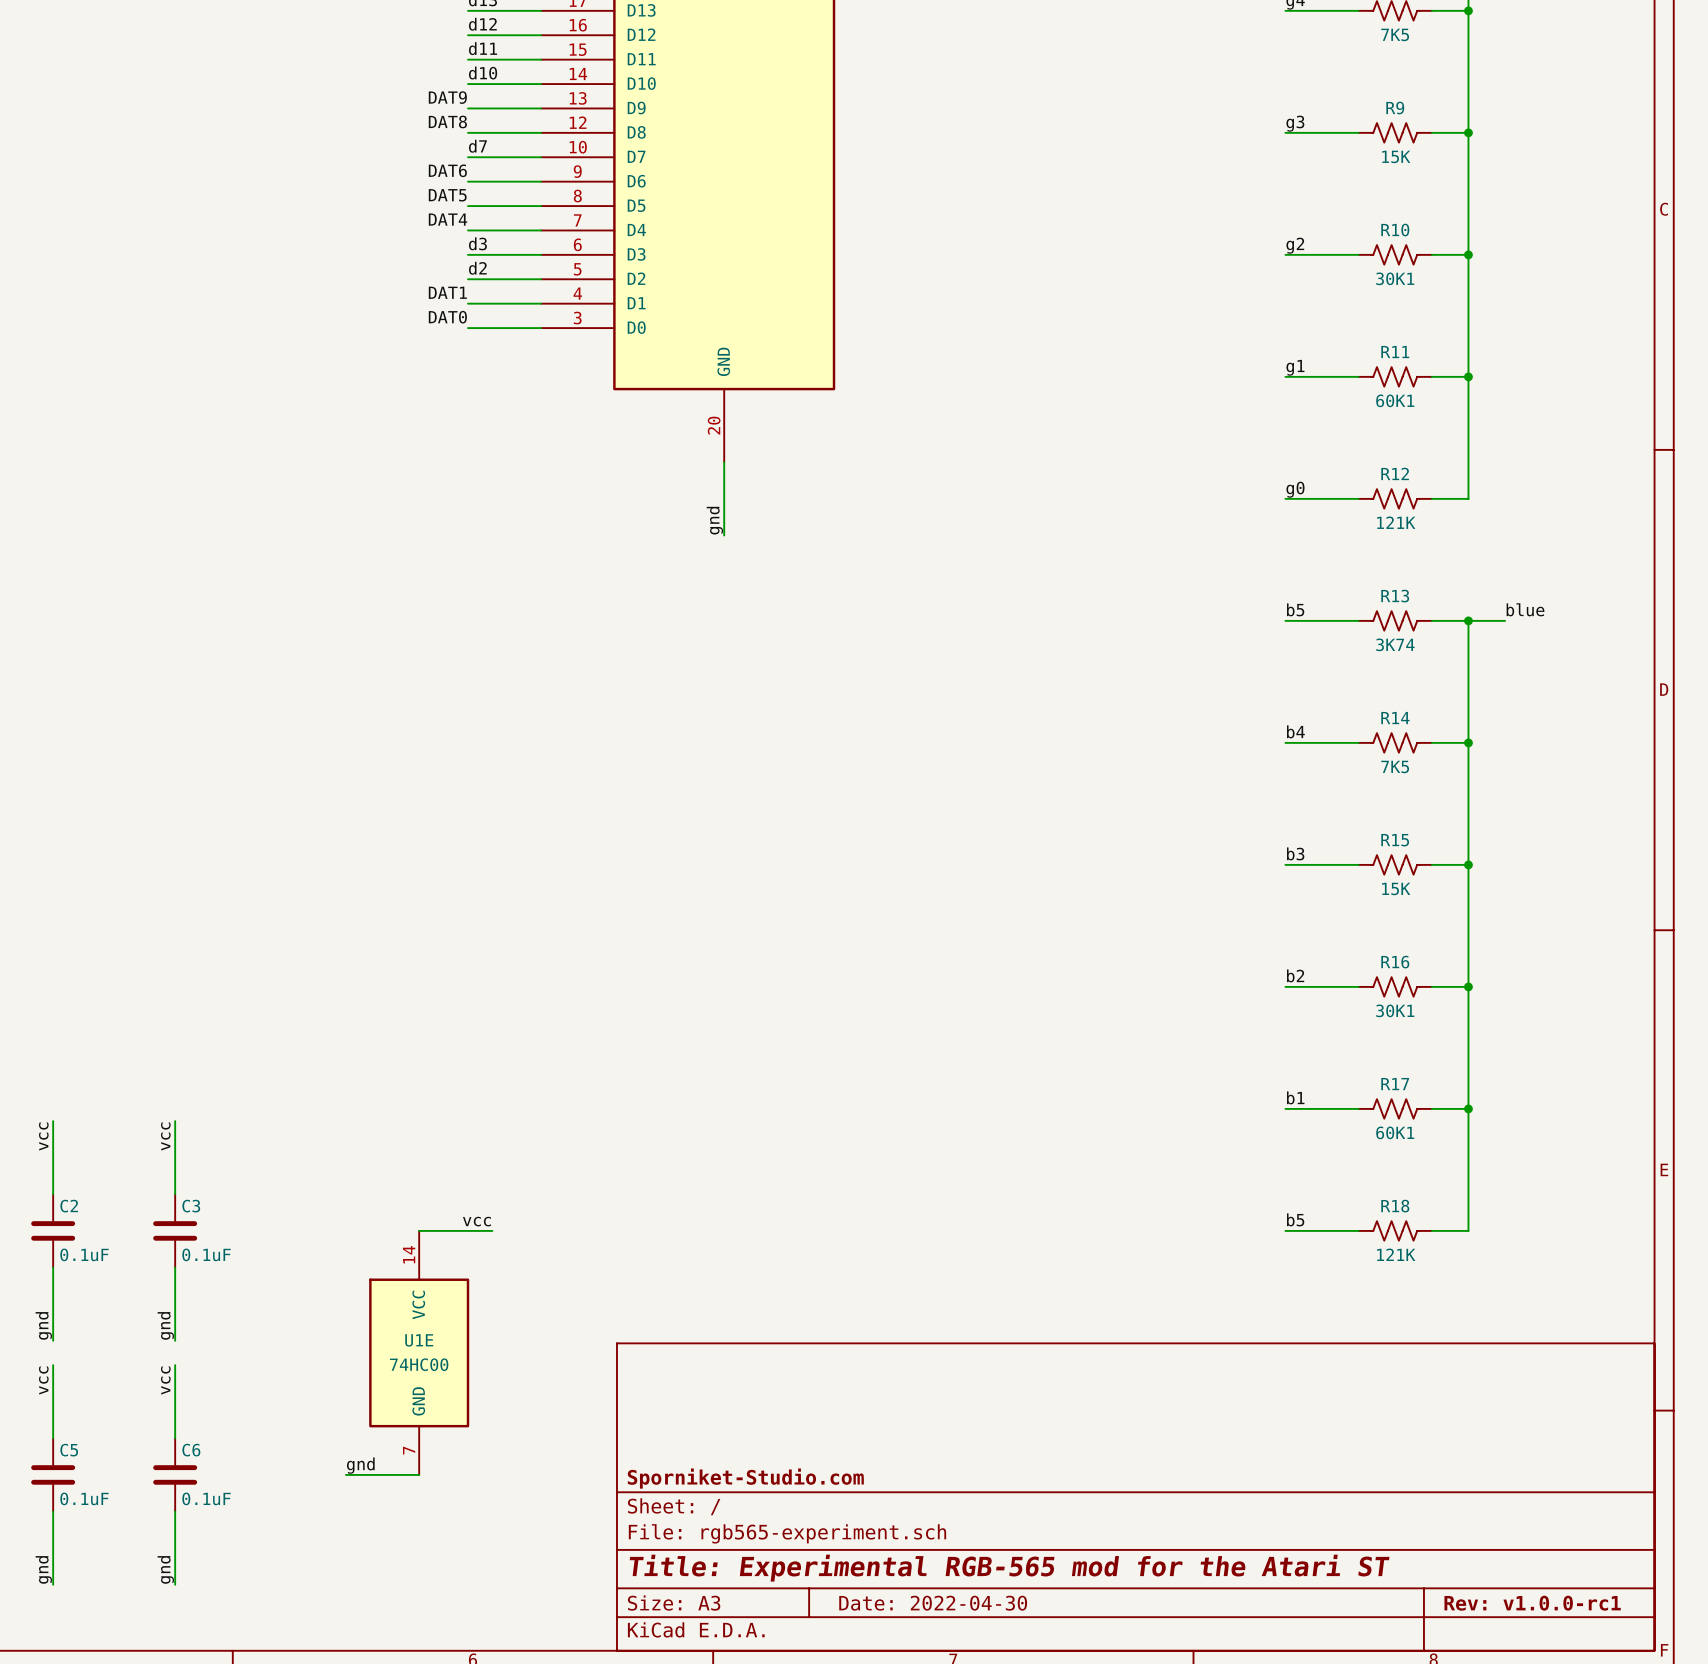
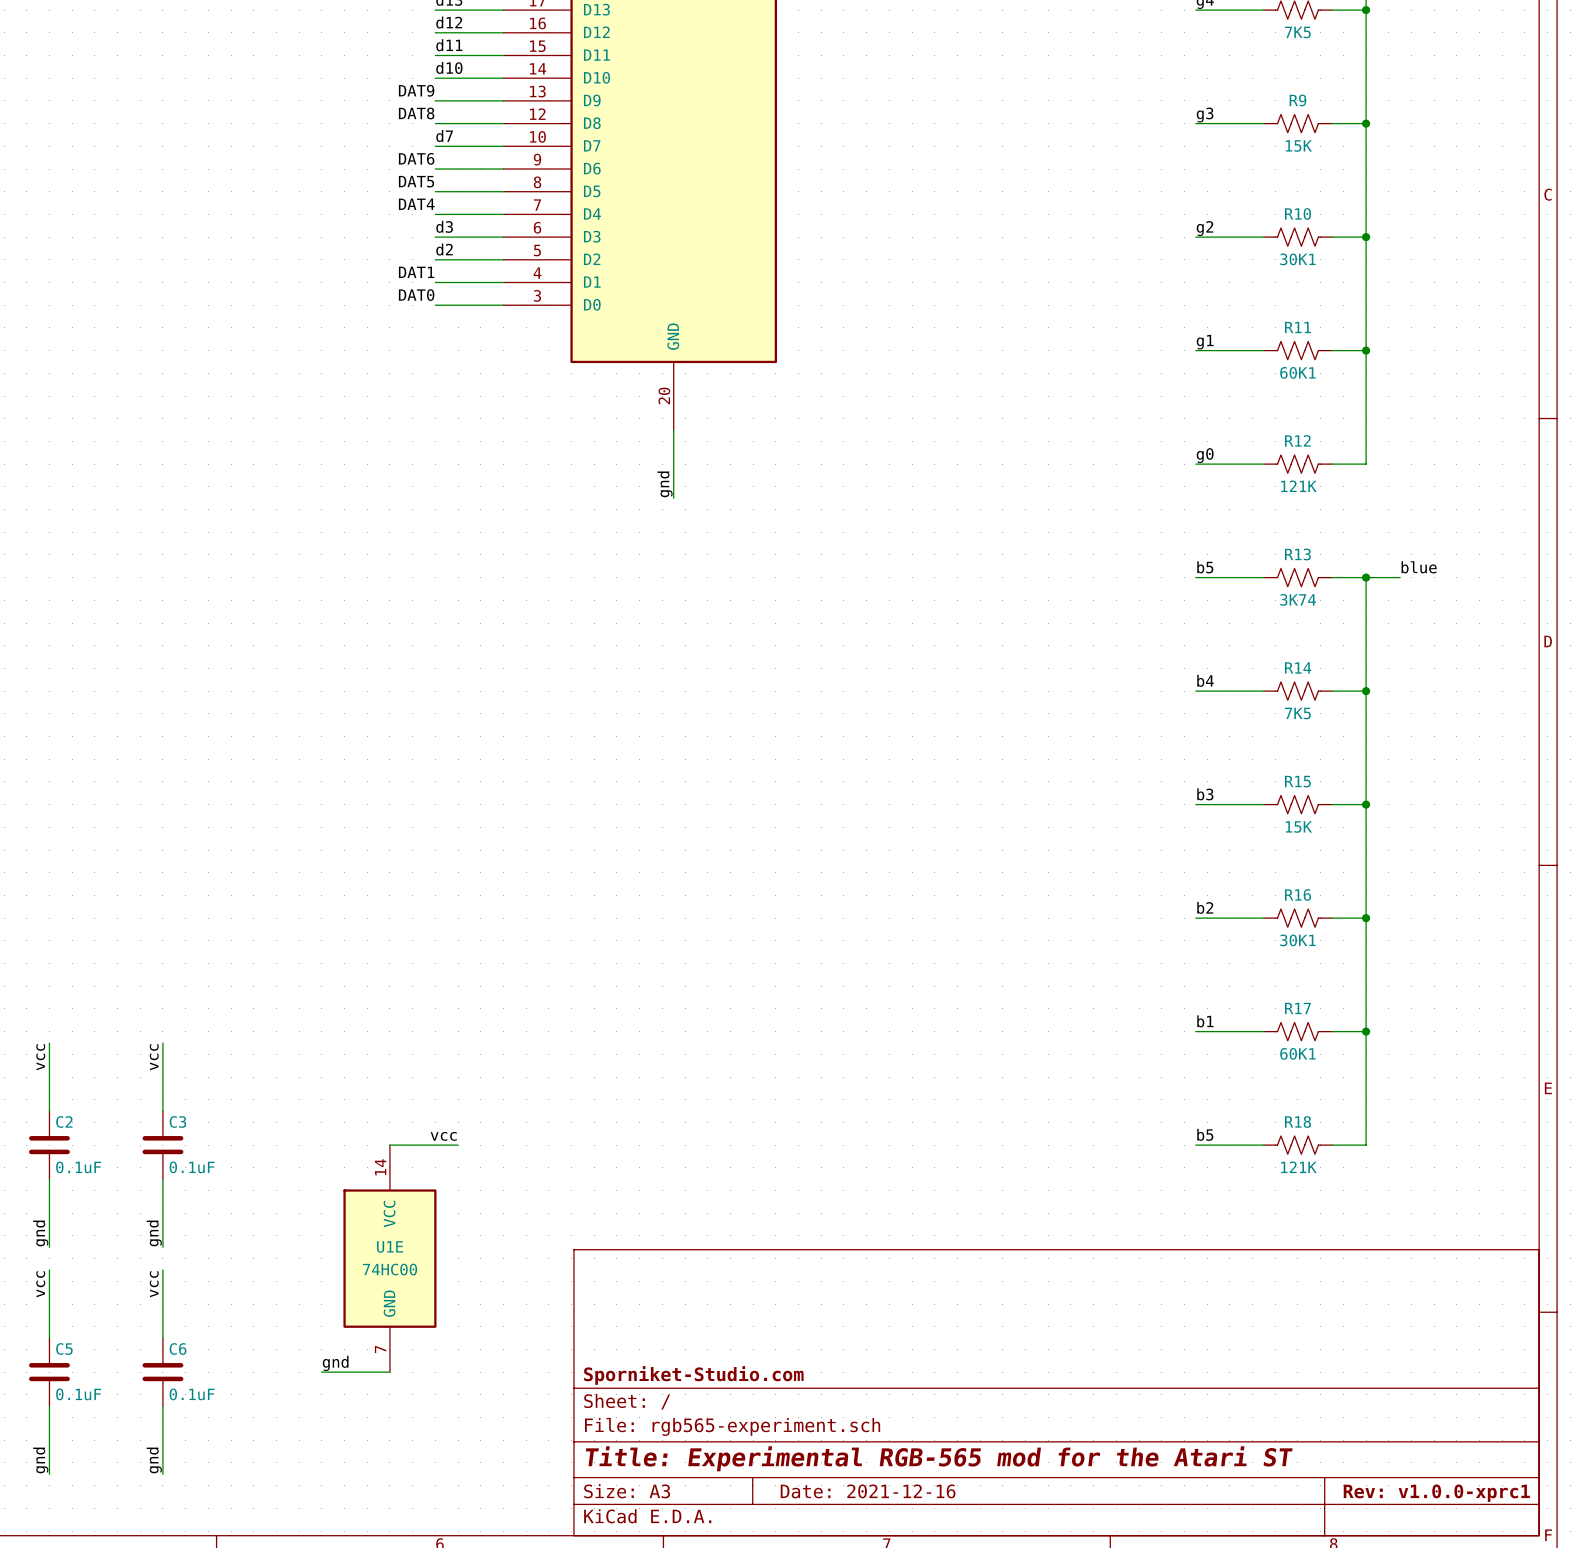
title block: Date: 2022-04-30 (933, 1603) -> Date: 2021-12-16 (868, 1491)
title block: Rev: v1.0.0-rc1 (1532, 1603) -> Rev: v1.0.0-xprc1 (1436, 1493)

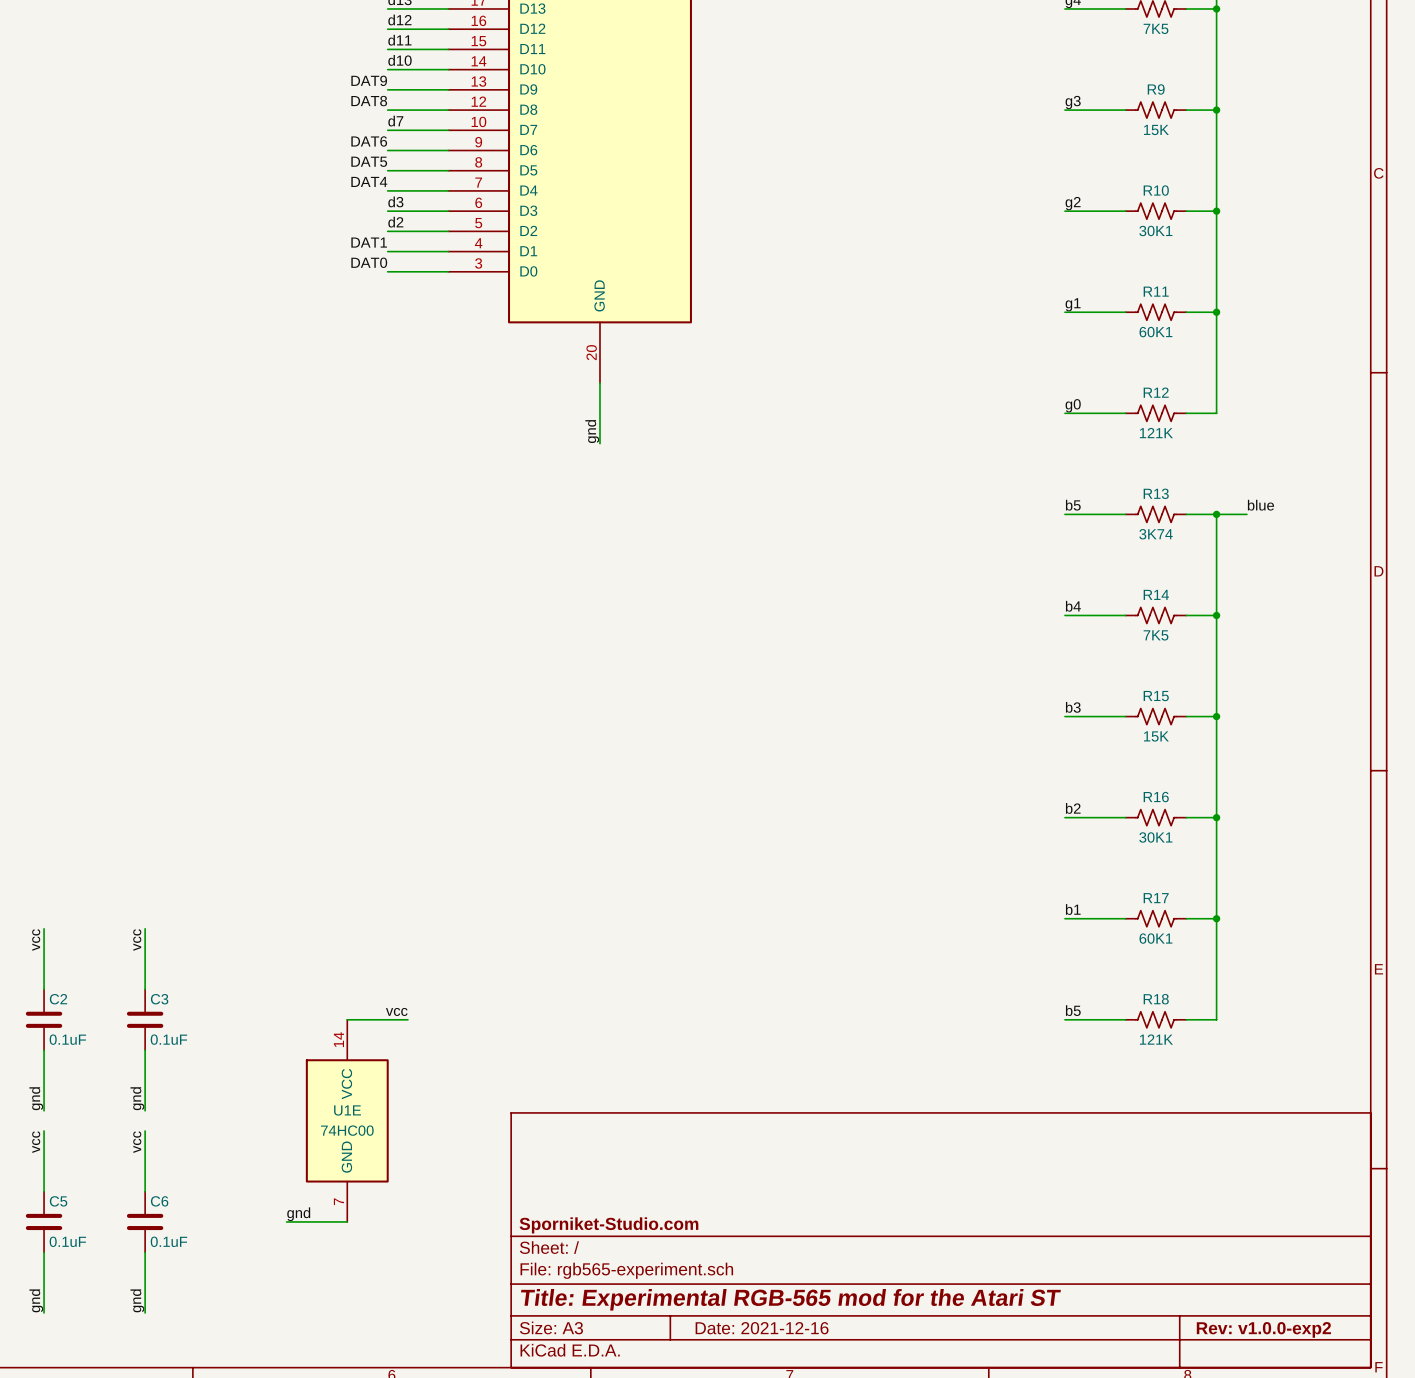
title block: Rev: v1.0.0-xprc1 (1436, 1493) -> Rev: v1.0.0-exp2 (1263, 1329)

